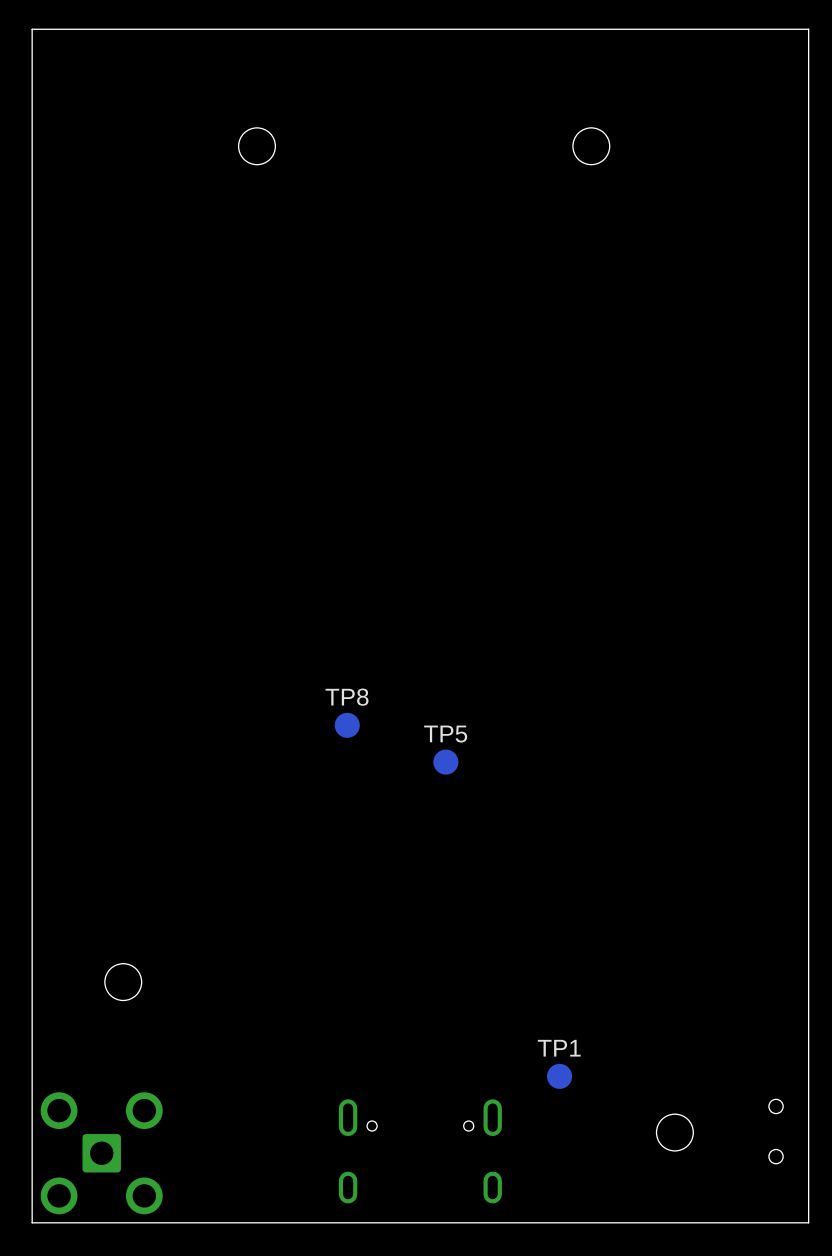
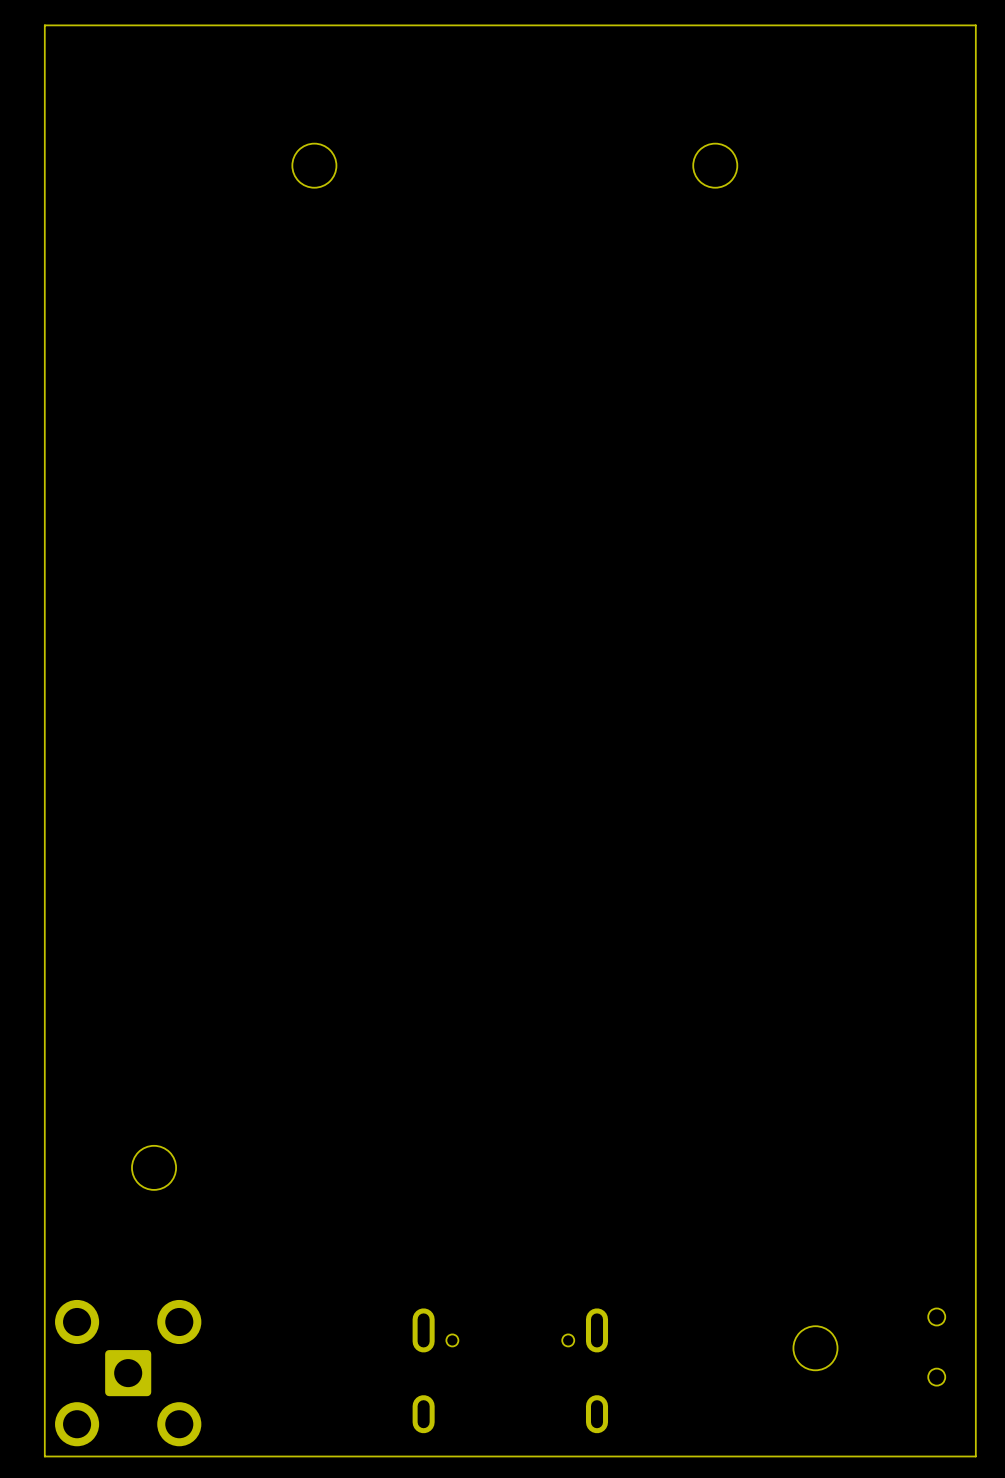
TP8: (347, 725) -> none
TP5: (445, 762) -> none
TP1: (559, 1076) -> none

